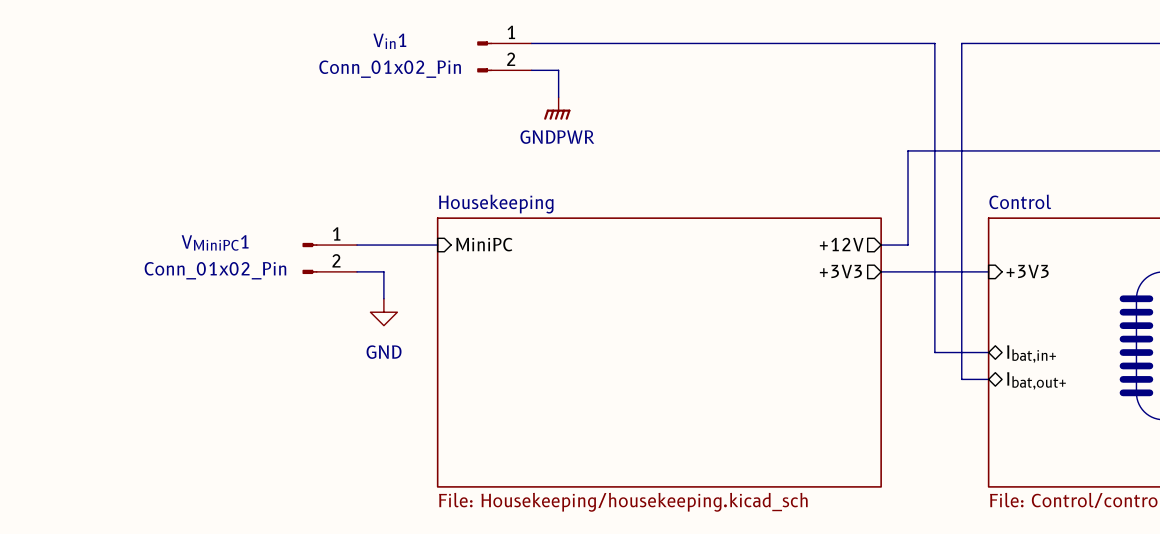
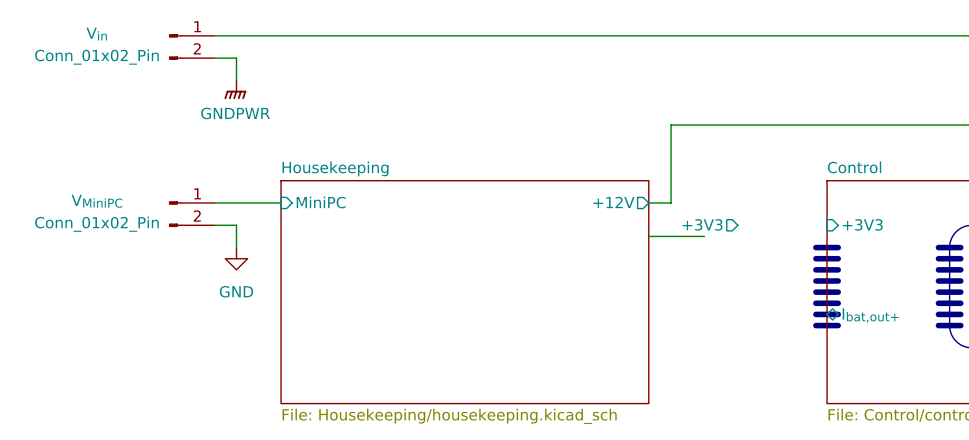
wire: none -> (214, 35) (448, 35)
wire: (934, 43) (934, 352) (988, 352) -> (782, 35) (804, 35)
wire: (961, 43) (961, 379) (988, 379) -> none
Vin: none -> Conn_01x02_Pin (191, 47)
Vin1: Conn_01x02_Pin (504, 56) -> none
wire: none -> (214, 58) (236, 58) (236, 80)
wire: (531, 70) (558, 70) (558, 97) -> none
power symbol: none -> GNDPWR (235, 89)
power symbol: GNDPWR (557, 108) -> none
wire: (908, 150) (908, 245) (881, 245) -> (760, 125) (671, 125) (671, 203) (648, 203)
sheet pin position: MiniPC (484, 244) -> MiniPC (321, 202)
sheet pin position: +12V (841, 244) -> +12V (614, 202)
wire: (357, 245) (437, 245) -> (214, 203) (281, 203)
VMiniPC: none -> Conn_01x02_Pin (191, 214)
VMiniPC1: Conn_01x02_Pin (329, 258) -> none
wire: (357, 271) (383, 271) (383, 298) -> (214, 225) (236, 225) (236, 247)
wire: (881, 271) (988, 271) -> none
wire: none -> (648, 236) (704, 236)
line: none -> (815, 247) (838, 247)
power symbol position: GND (383, 312) -> GND (236, 258)
line: none -> (815, 258) (838, 258)
line: none -> (815, 269) (838, 269)
line: none -> (815, 281) (838, 281)
sheet Housekeeping position: (659, 352) -> (464, 292)
line: none -> (815, 292) (838, 292)
sheet pin: Ibat,in+ (1031, 354) -> none
line: none -> (815, 303) (838, 303)
line: none -> (815, 314) (838, 314)
line: none -> (815, 325) (838, 325)

